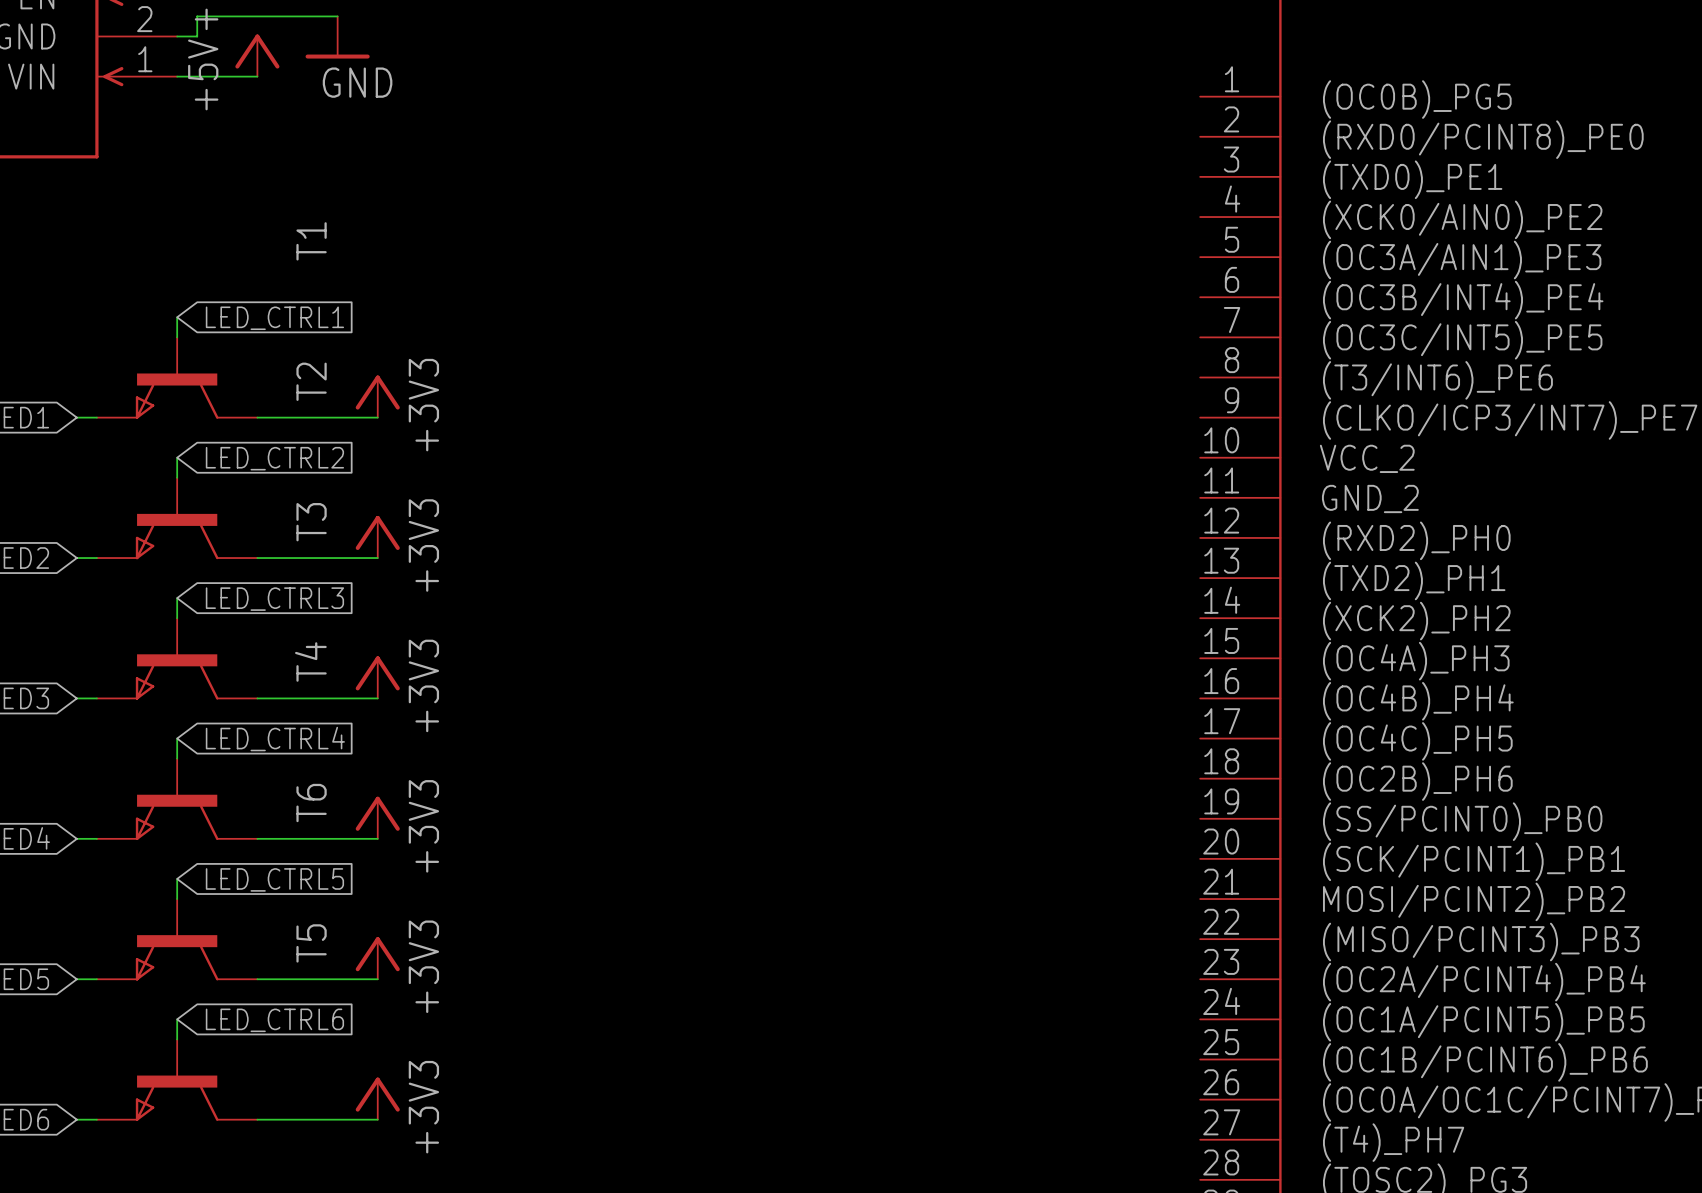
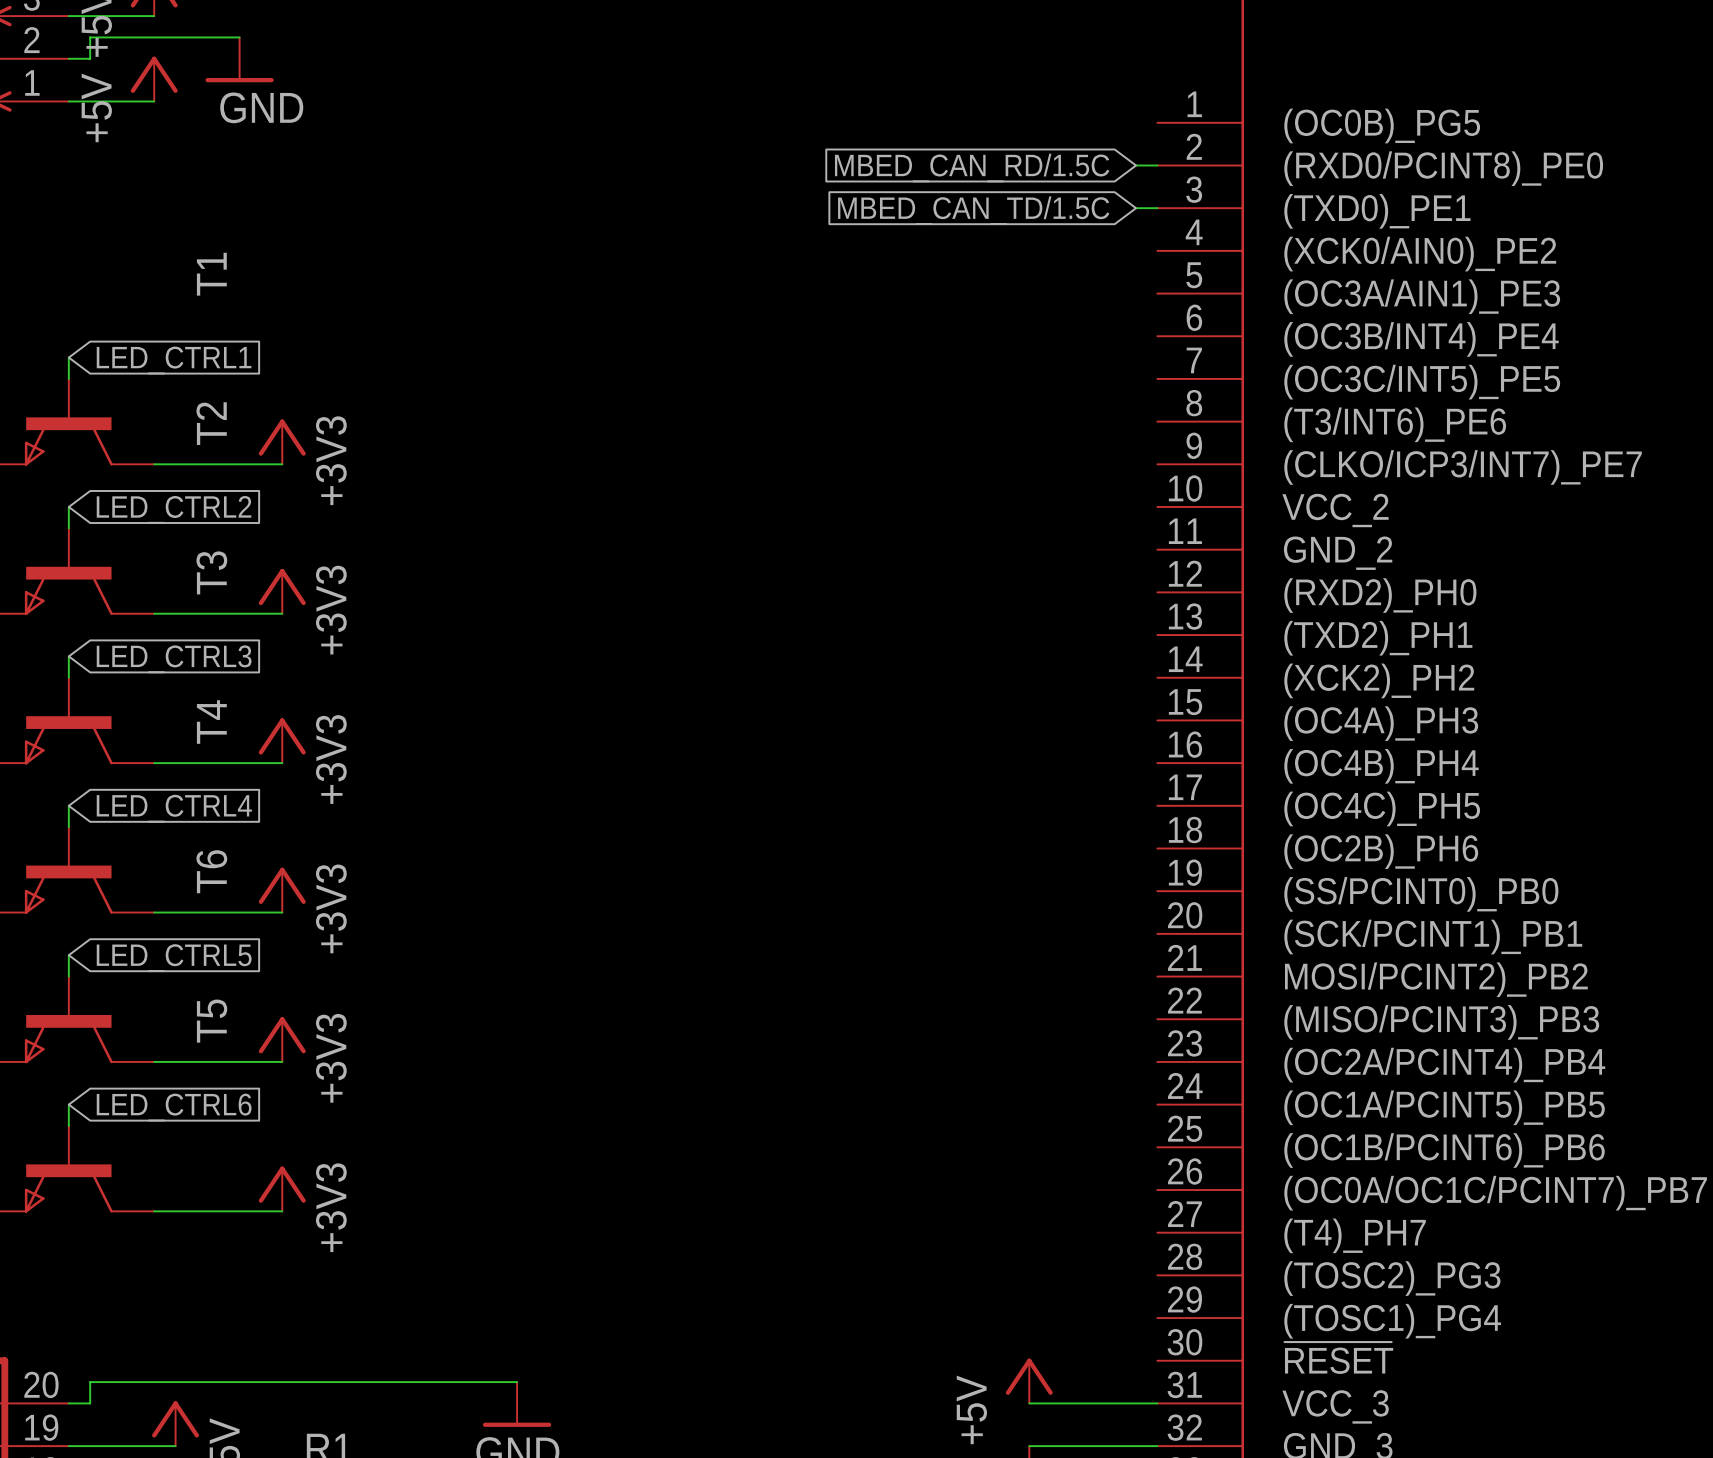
wire: none -> (1136, 165) (1157, 165)
global label: none -> MBED_CAN_RD/1.5C (972, 168)
wire: none -> (1136, 208) (1157, 208)
global label: none -> MBED_CAN_TD/1.5C (973, 210)

